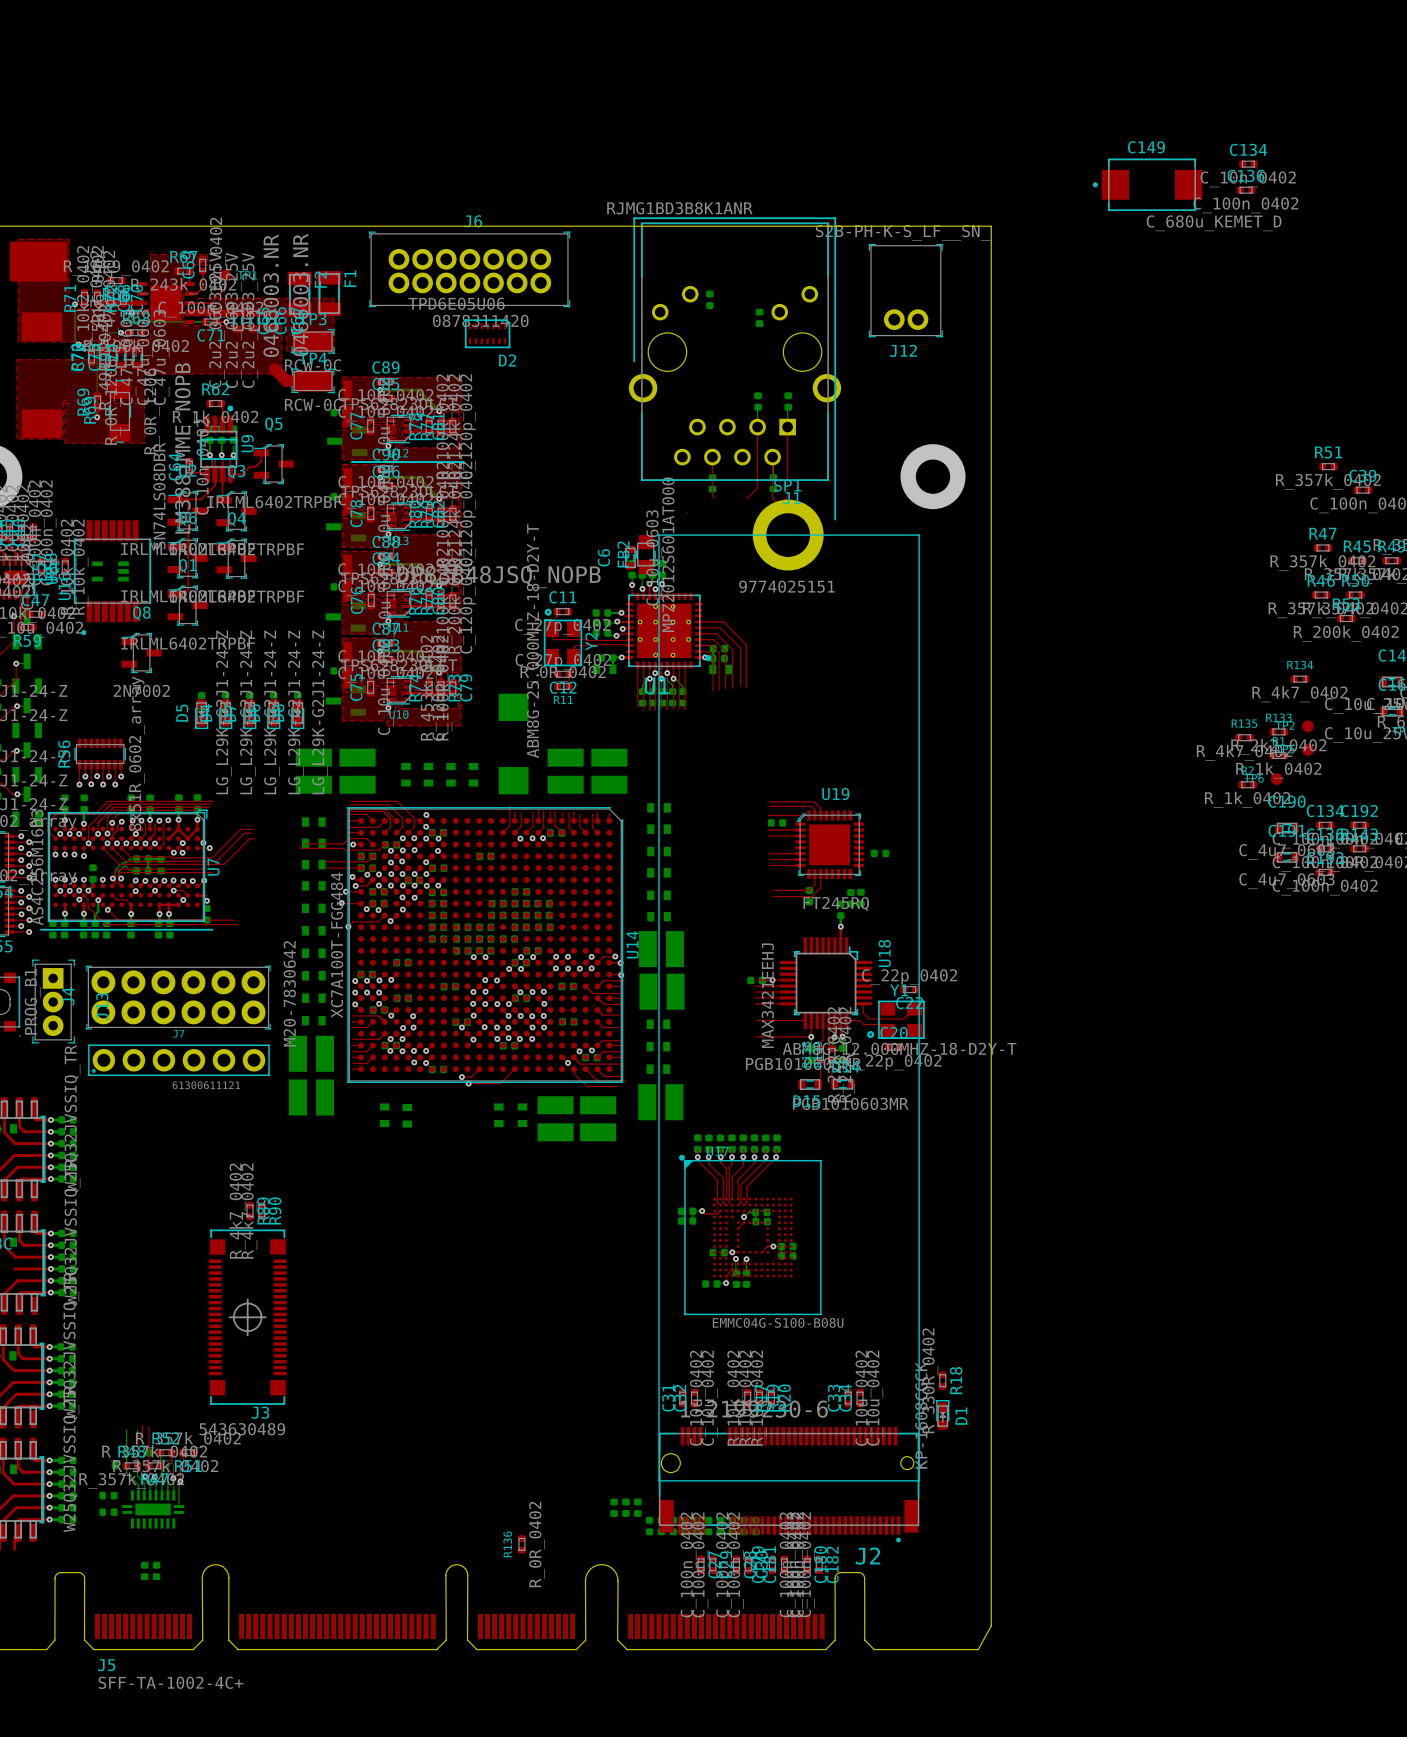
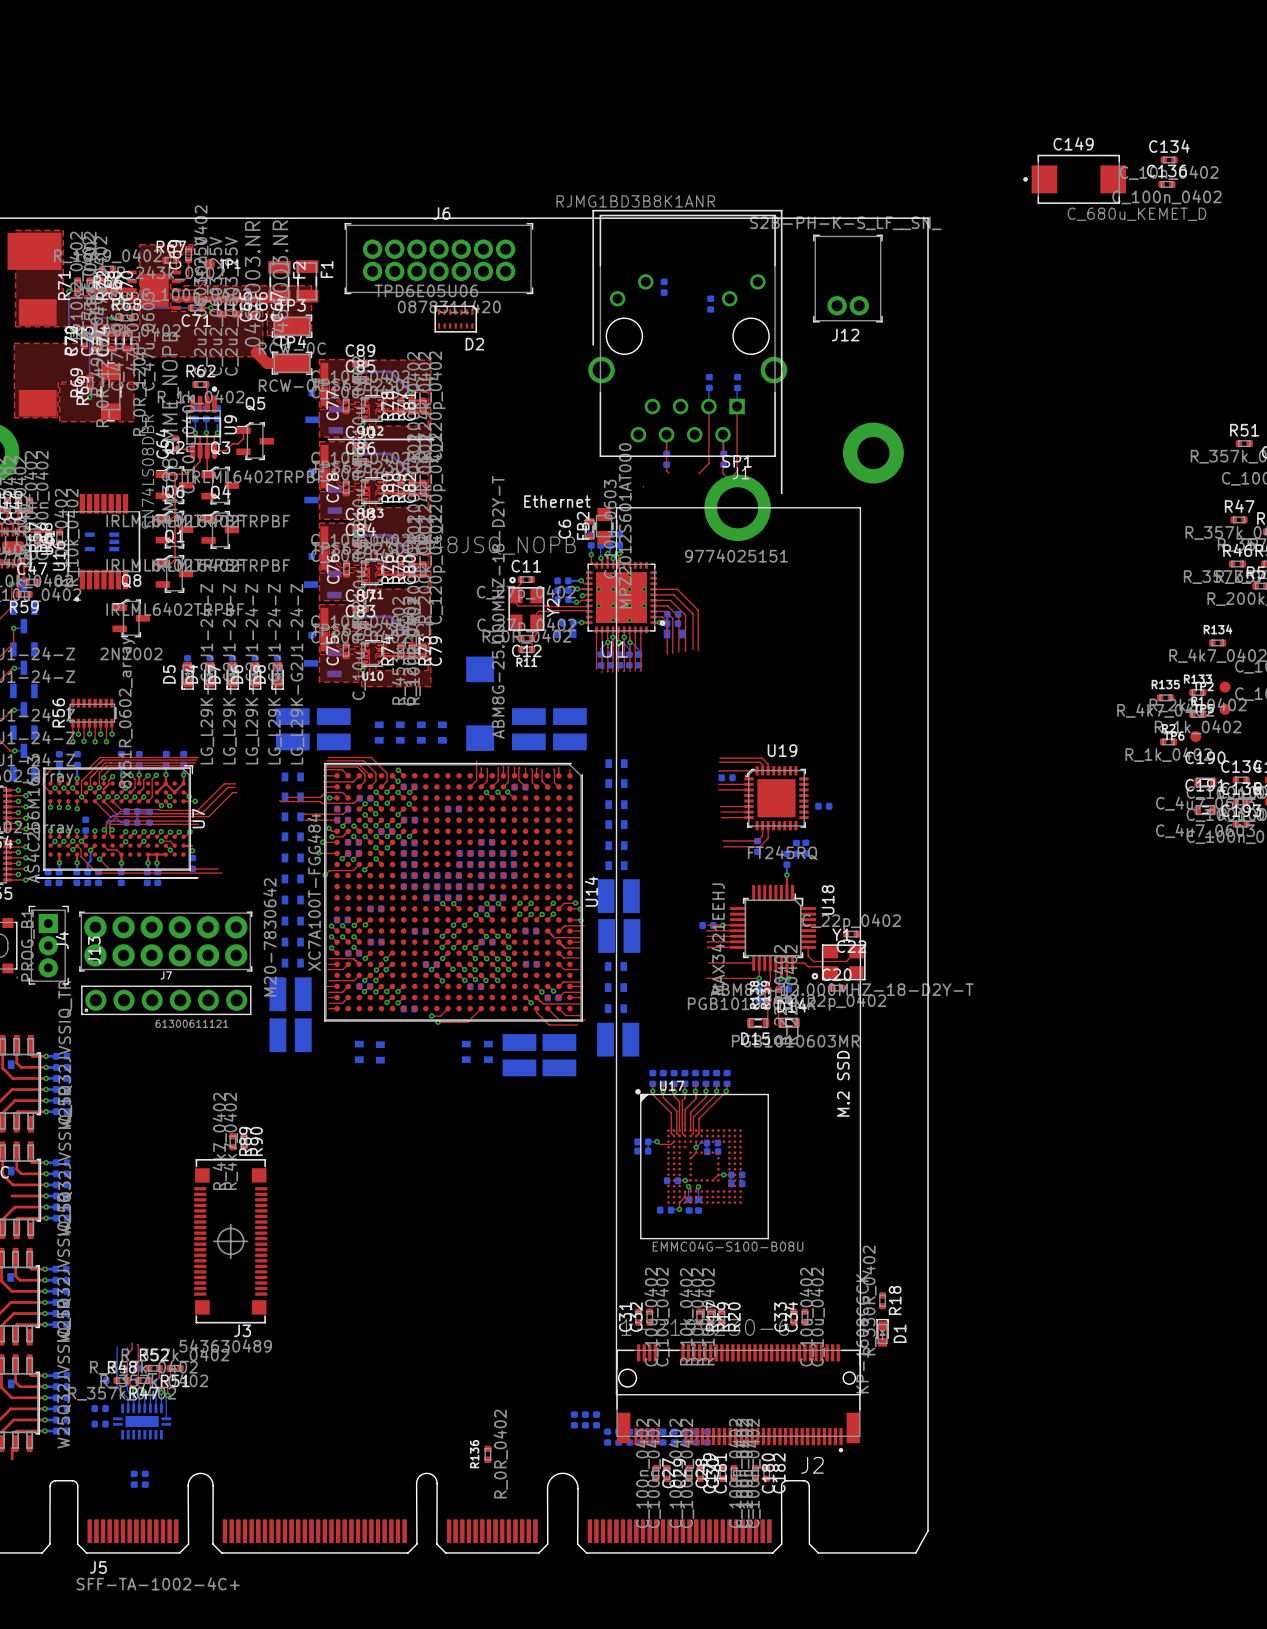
text: none -> Ethernet (557, 501)
text: none -> M.2 SSD (843, 1083)

